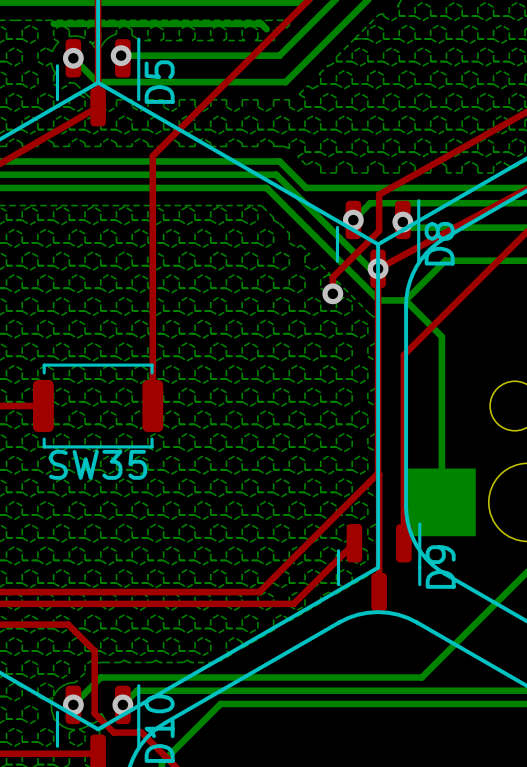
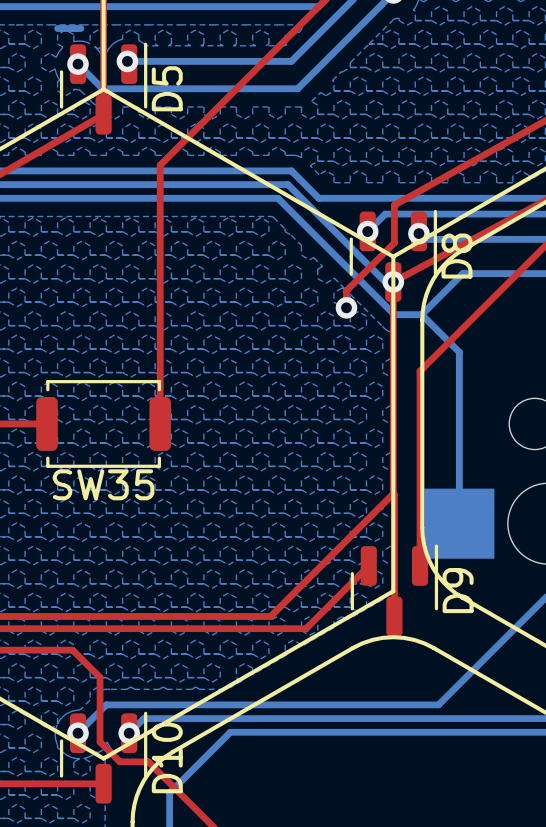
bottom track: (76, 23) (261, 23) (266, 29) -> none

